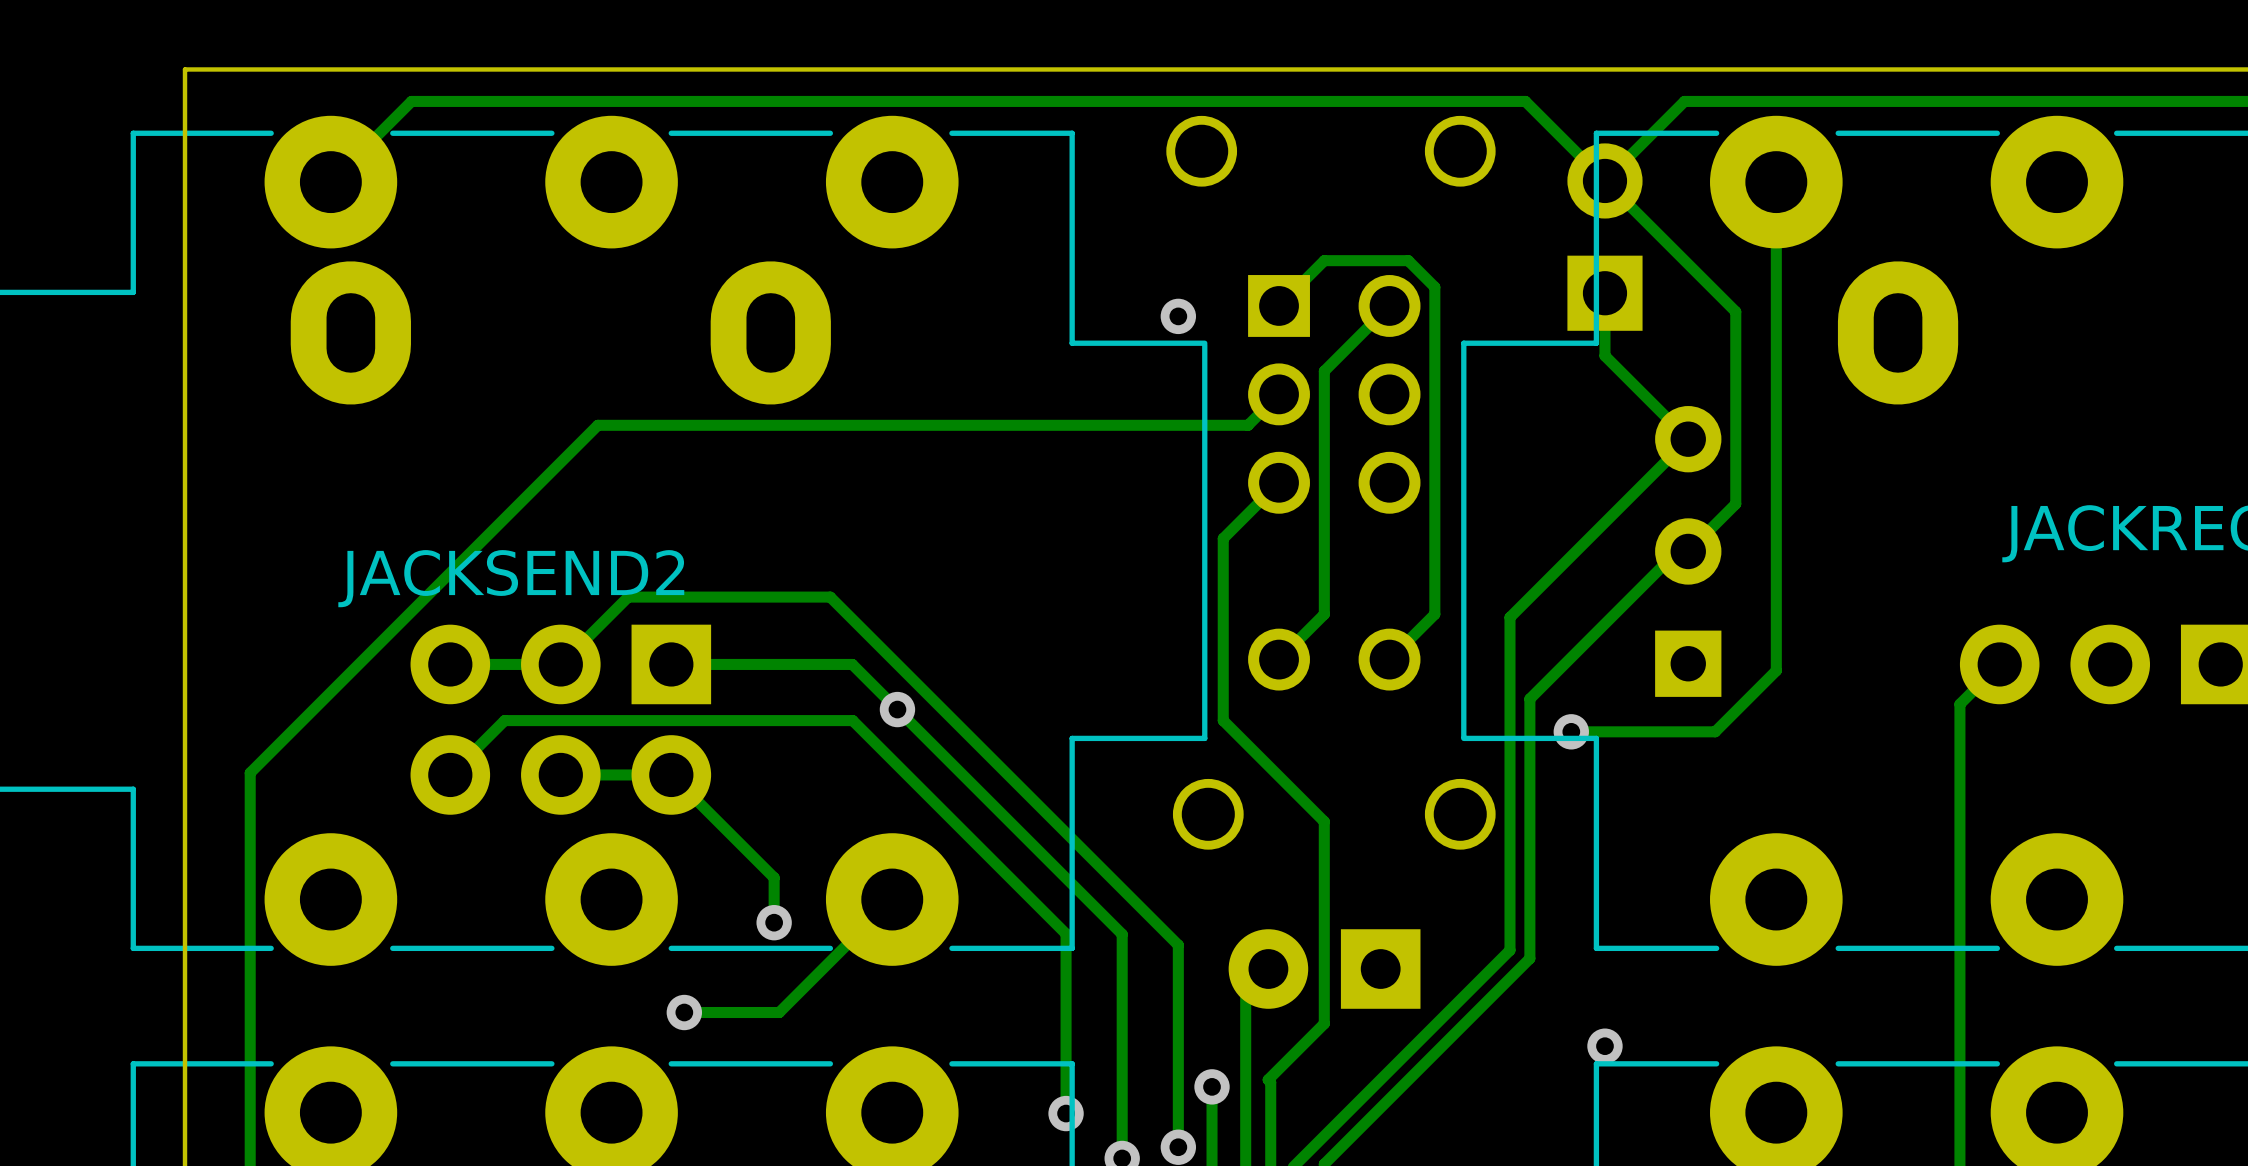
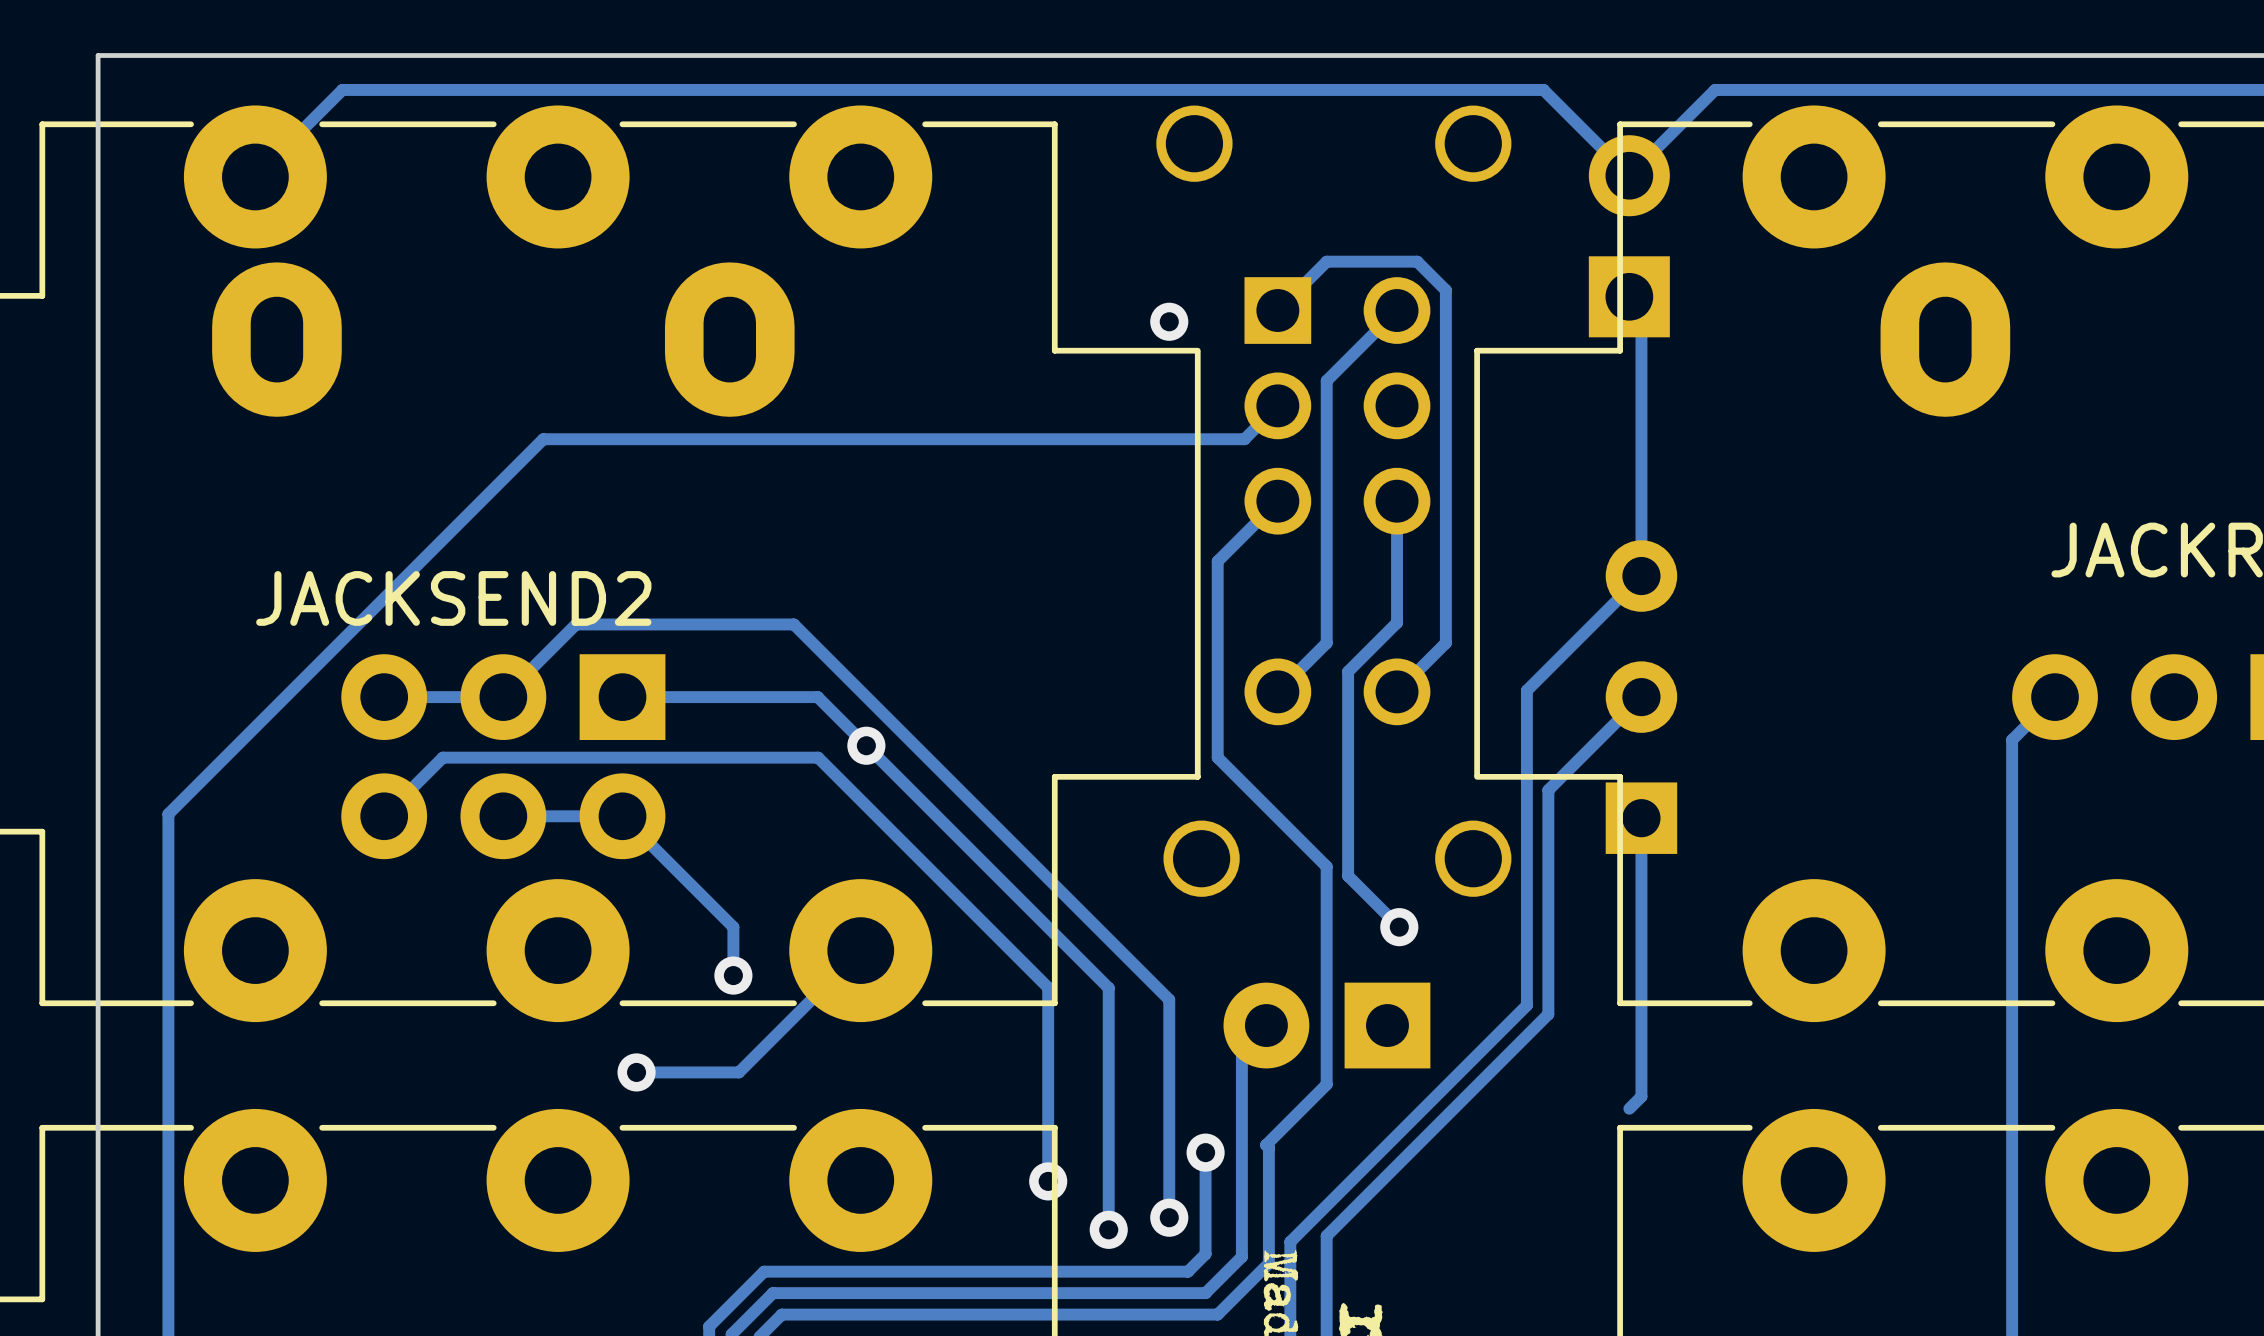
track: (1604, 180) (1735, 311) (1735, 503) (1688, 551) -> none
track: (1776, 182) (1776, 670) (1715, 731) (1571, 731) -> none
track: (1604, 293) (1604, 355) (1688, 439) (1509, 617) (1509, 658) -> (1641, 308) (1641, 576) (1526, 690)
track: none -> (1397, 501) (1397, 622) (1348, 671) (1348, 875) (1399, 927)
track: (1677, 551) (1529, 698) (1529, 750) -> (1641, 697) (1548, 790)
part position: (1688, 551) -> (1641, 697)
via: (1571, 731) -> none
track: none -> (1641, 818) (1641, 1096) (1629, 1108)
via: none -> (1399, 927)
via: (1604, 1046) -> none

